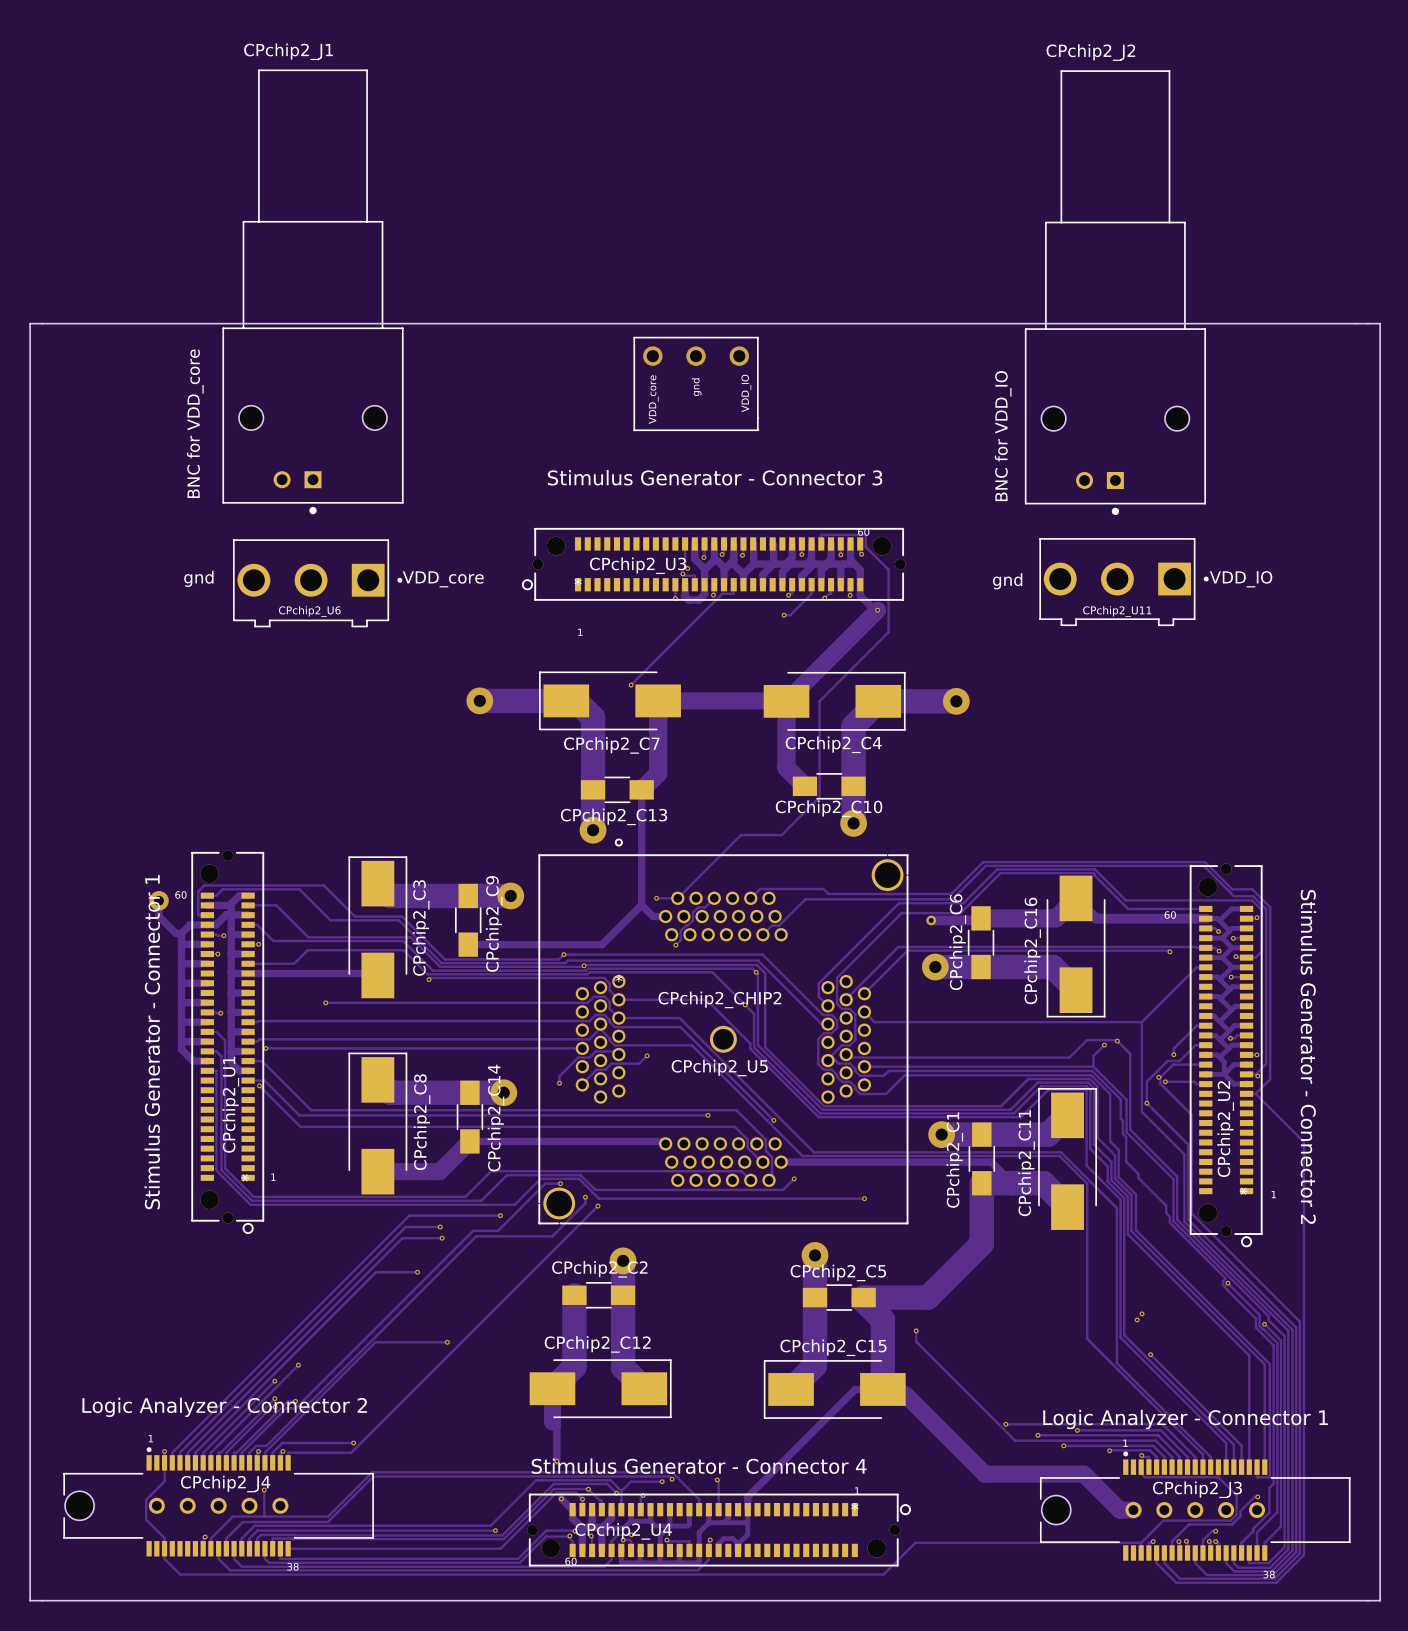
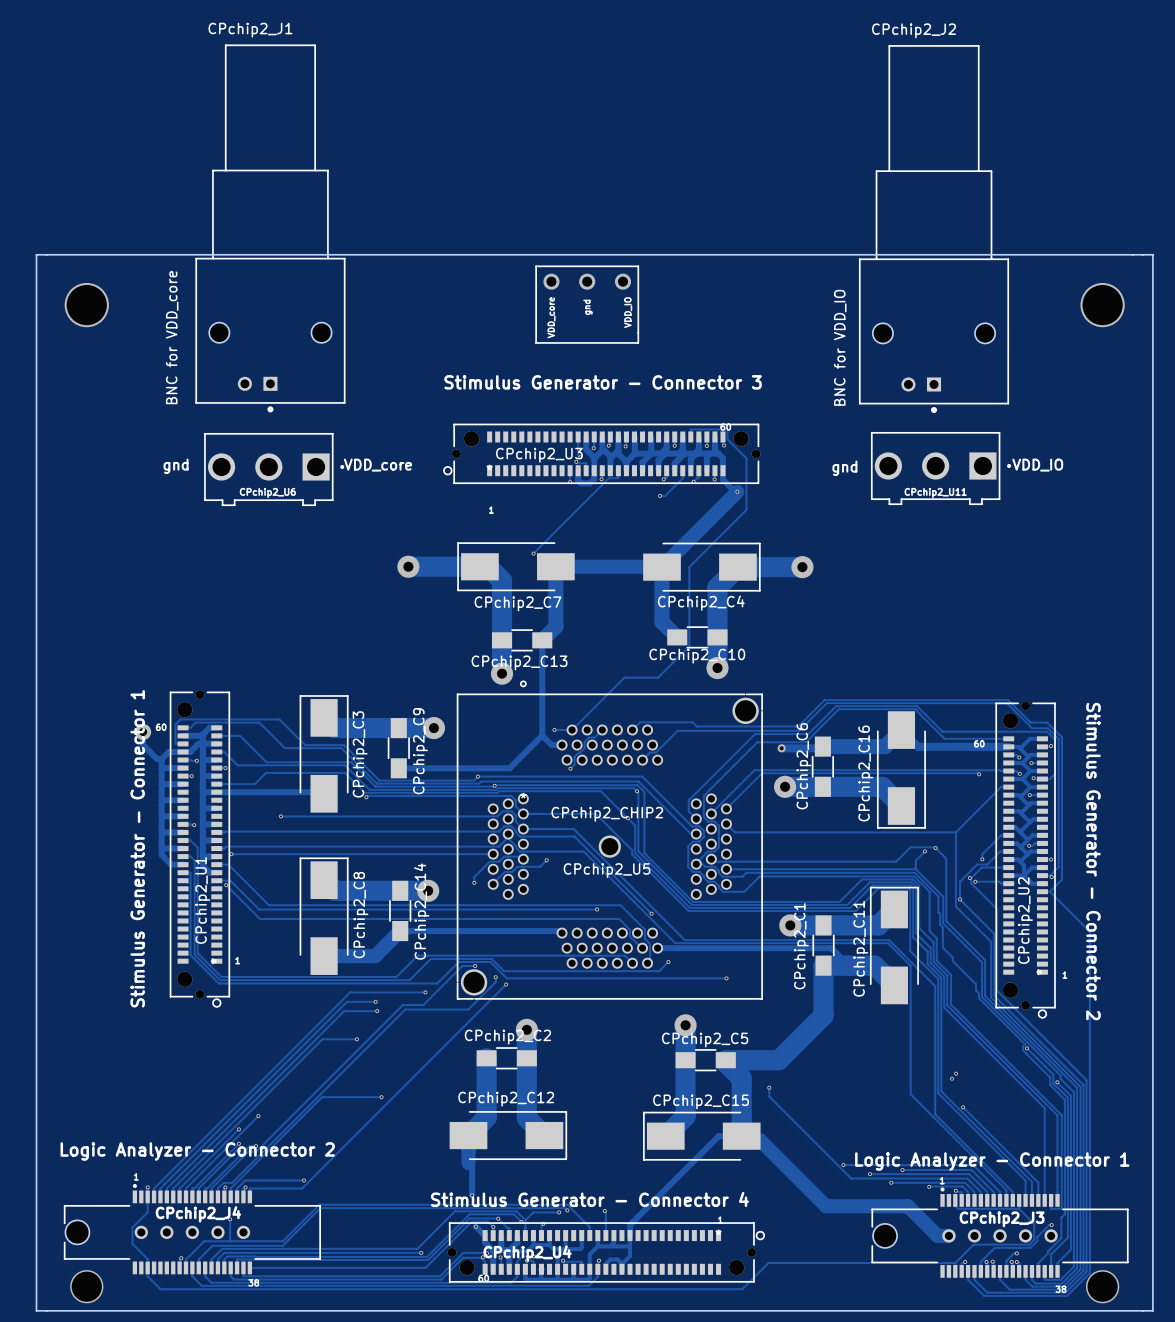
via: none -> (86, 305)
via: none -> (1102, 305)
via: none -> (86, 1286)
via: none -> (1102, 1286)

